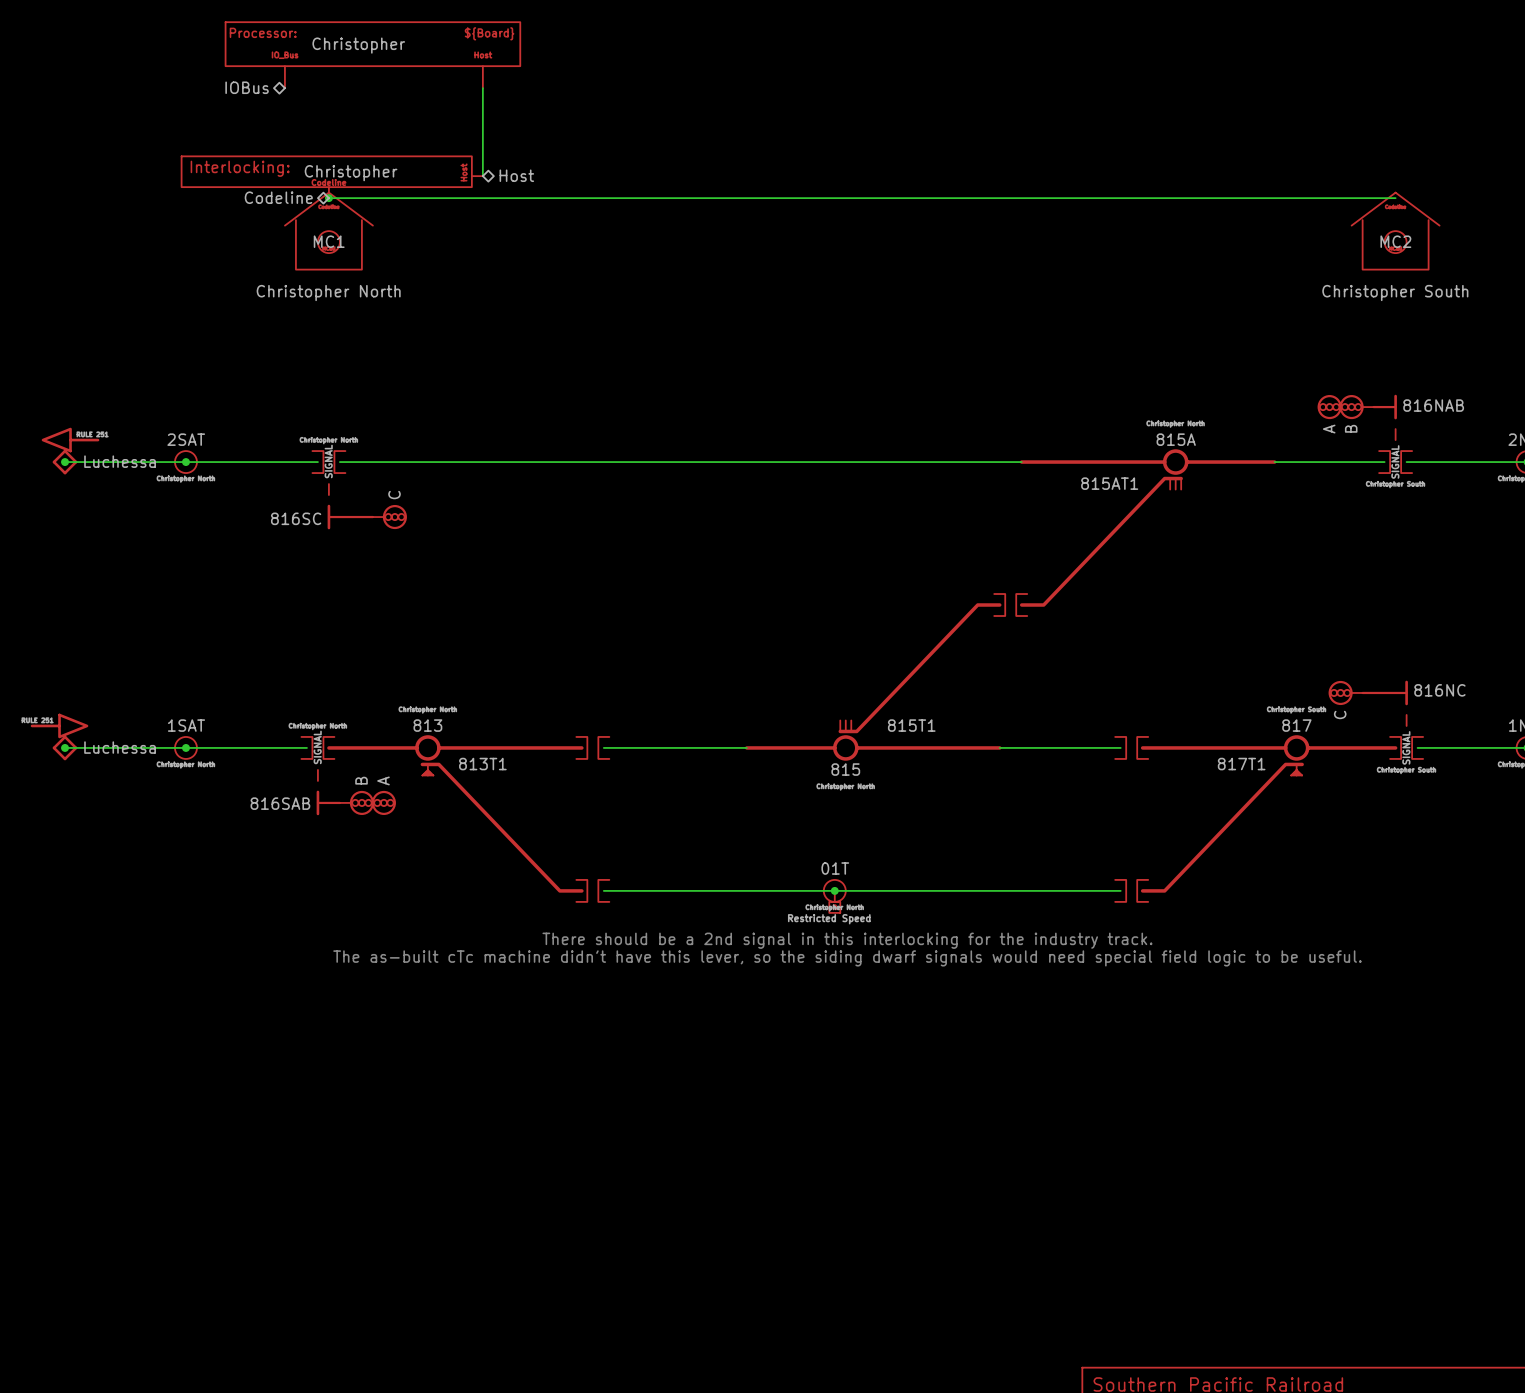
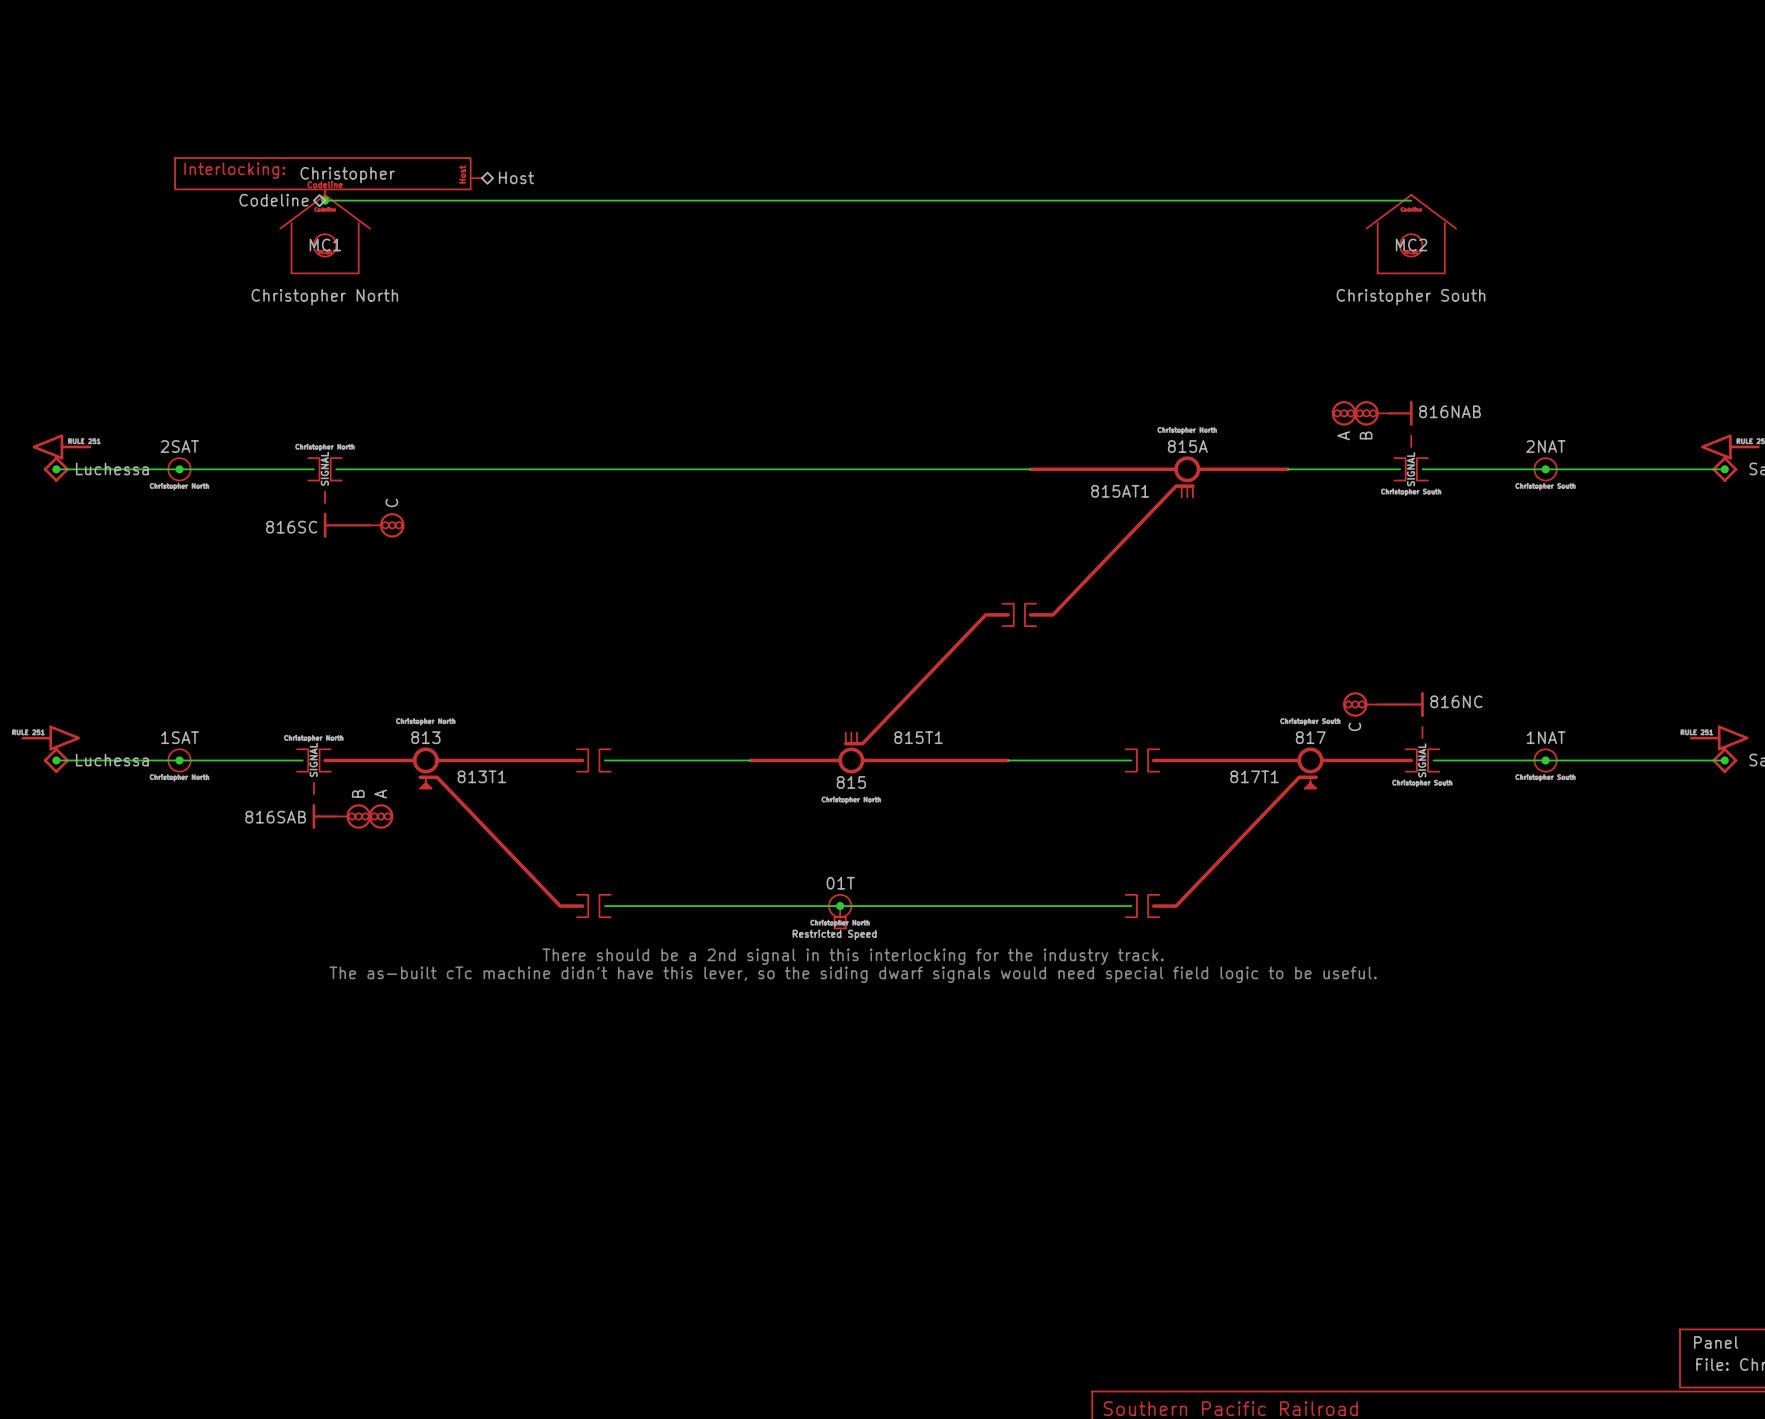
part: Christopher (372, 55) -> none
hierarchical label: IOBus (247, 87) -> none
wire: (482, 88) (482, 176) -> none

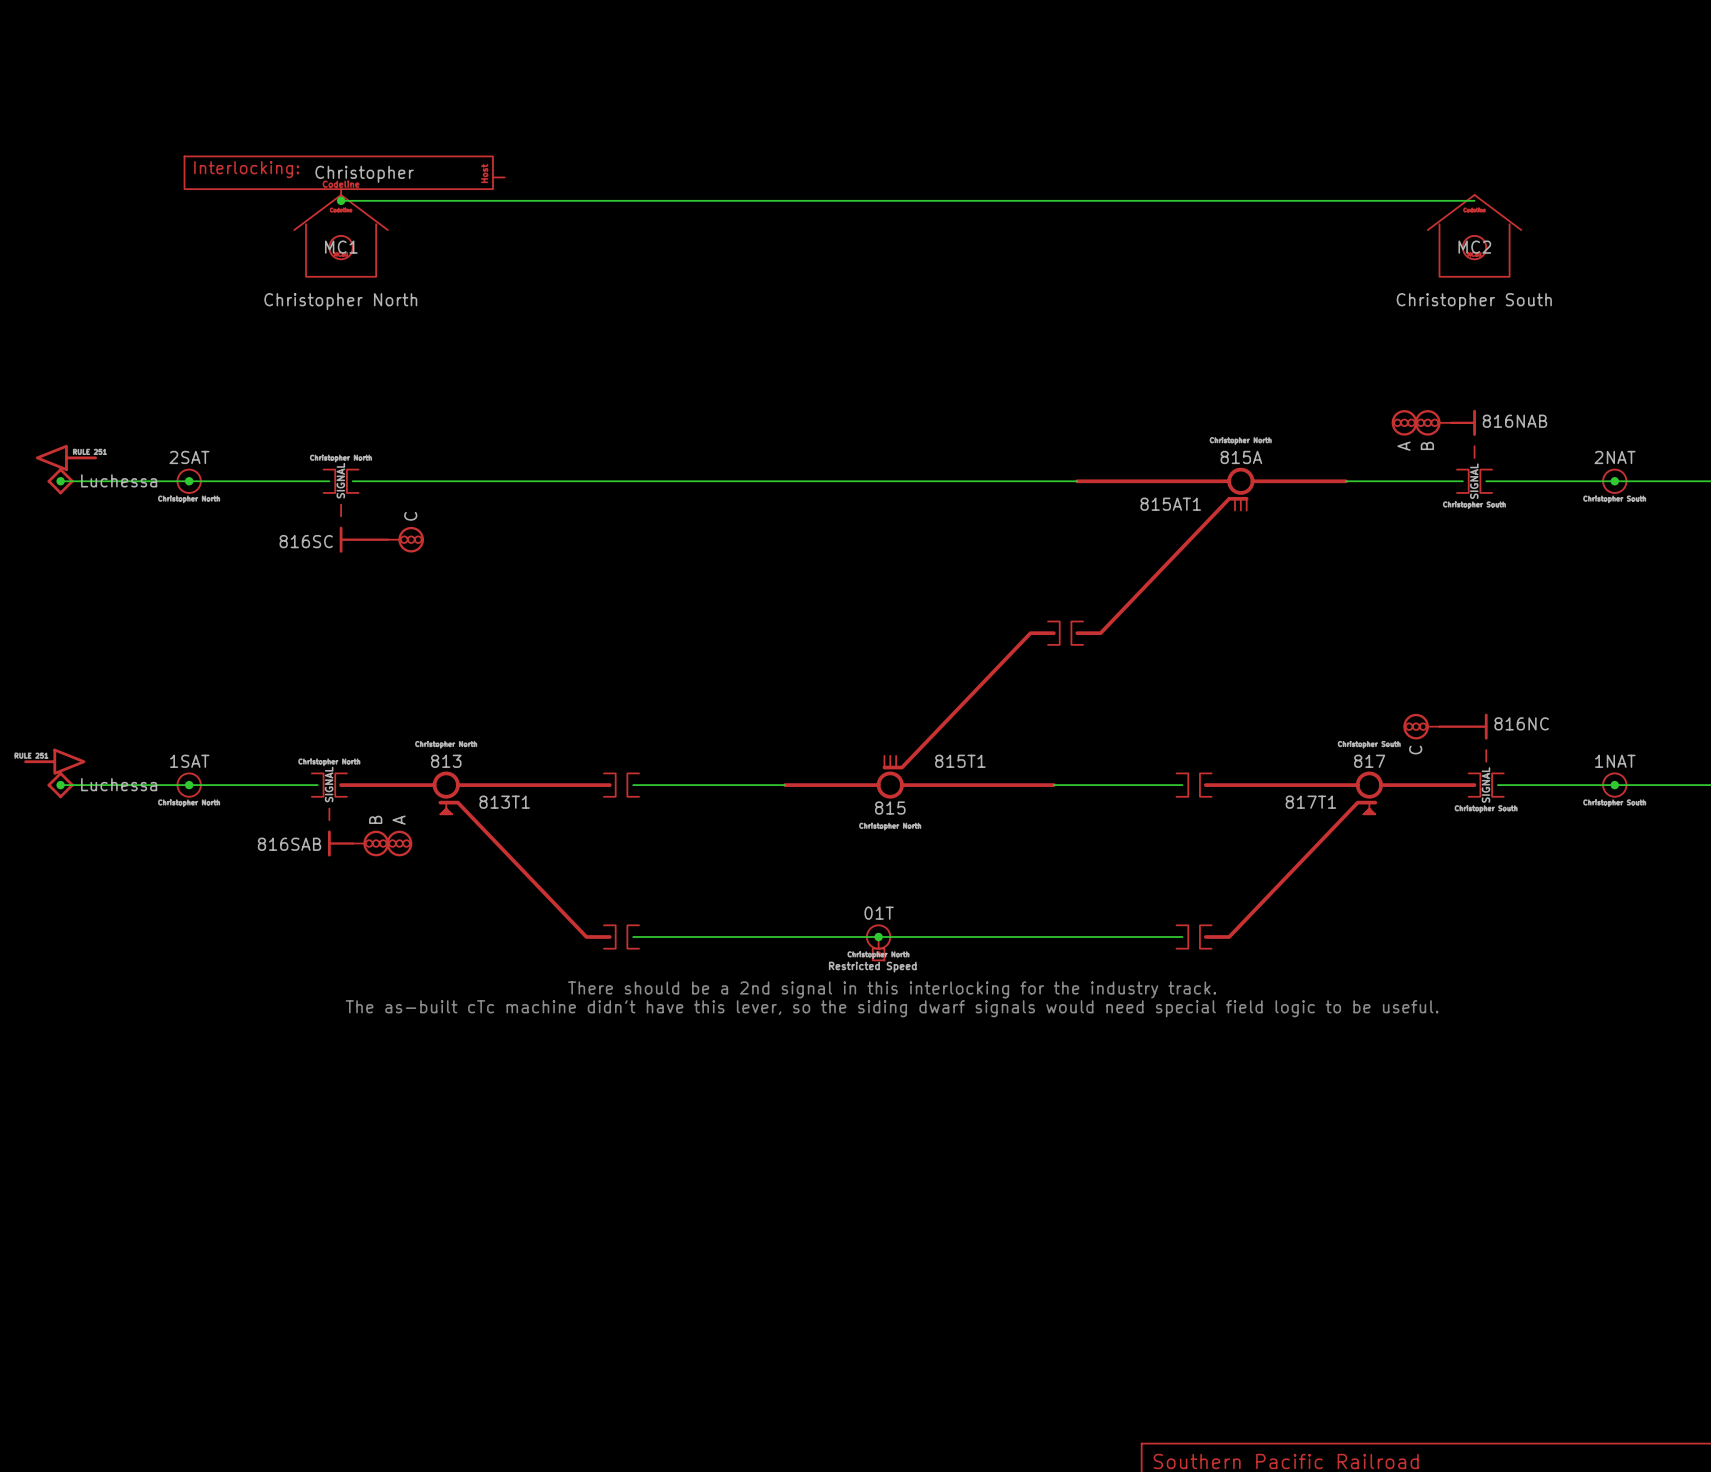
hierarchical label: Host (516, 177) -> none
hierarchical label: Codeline (274, 200) -> none

